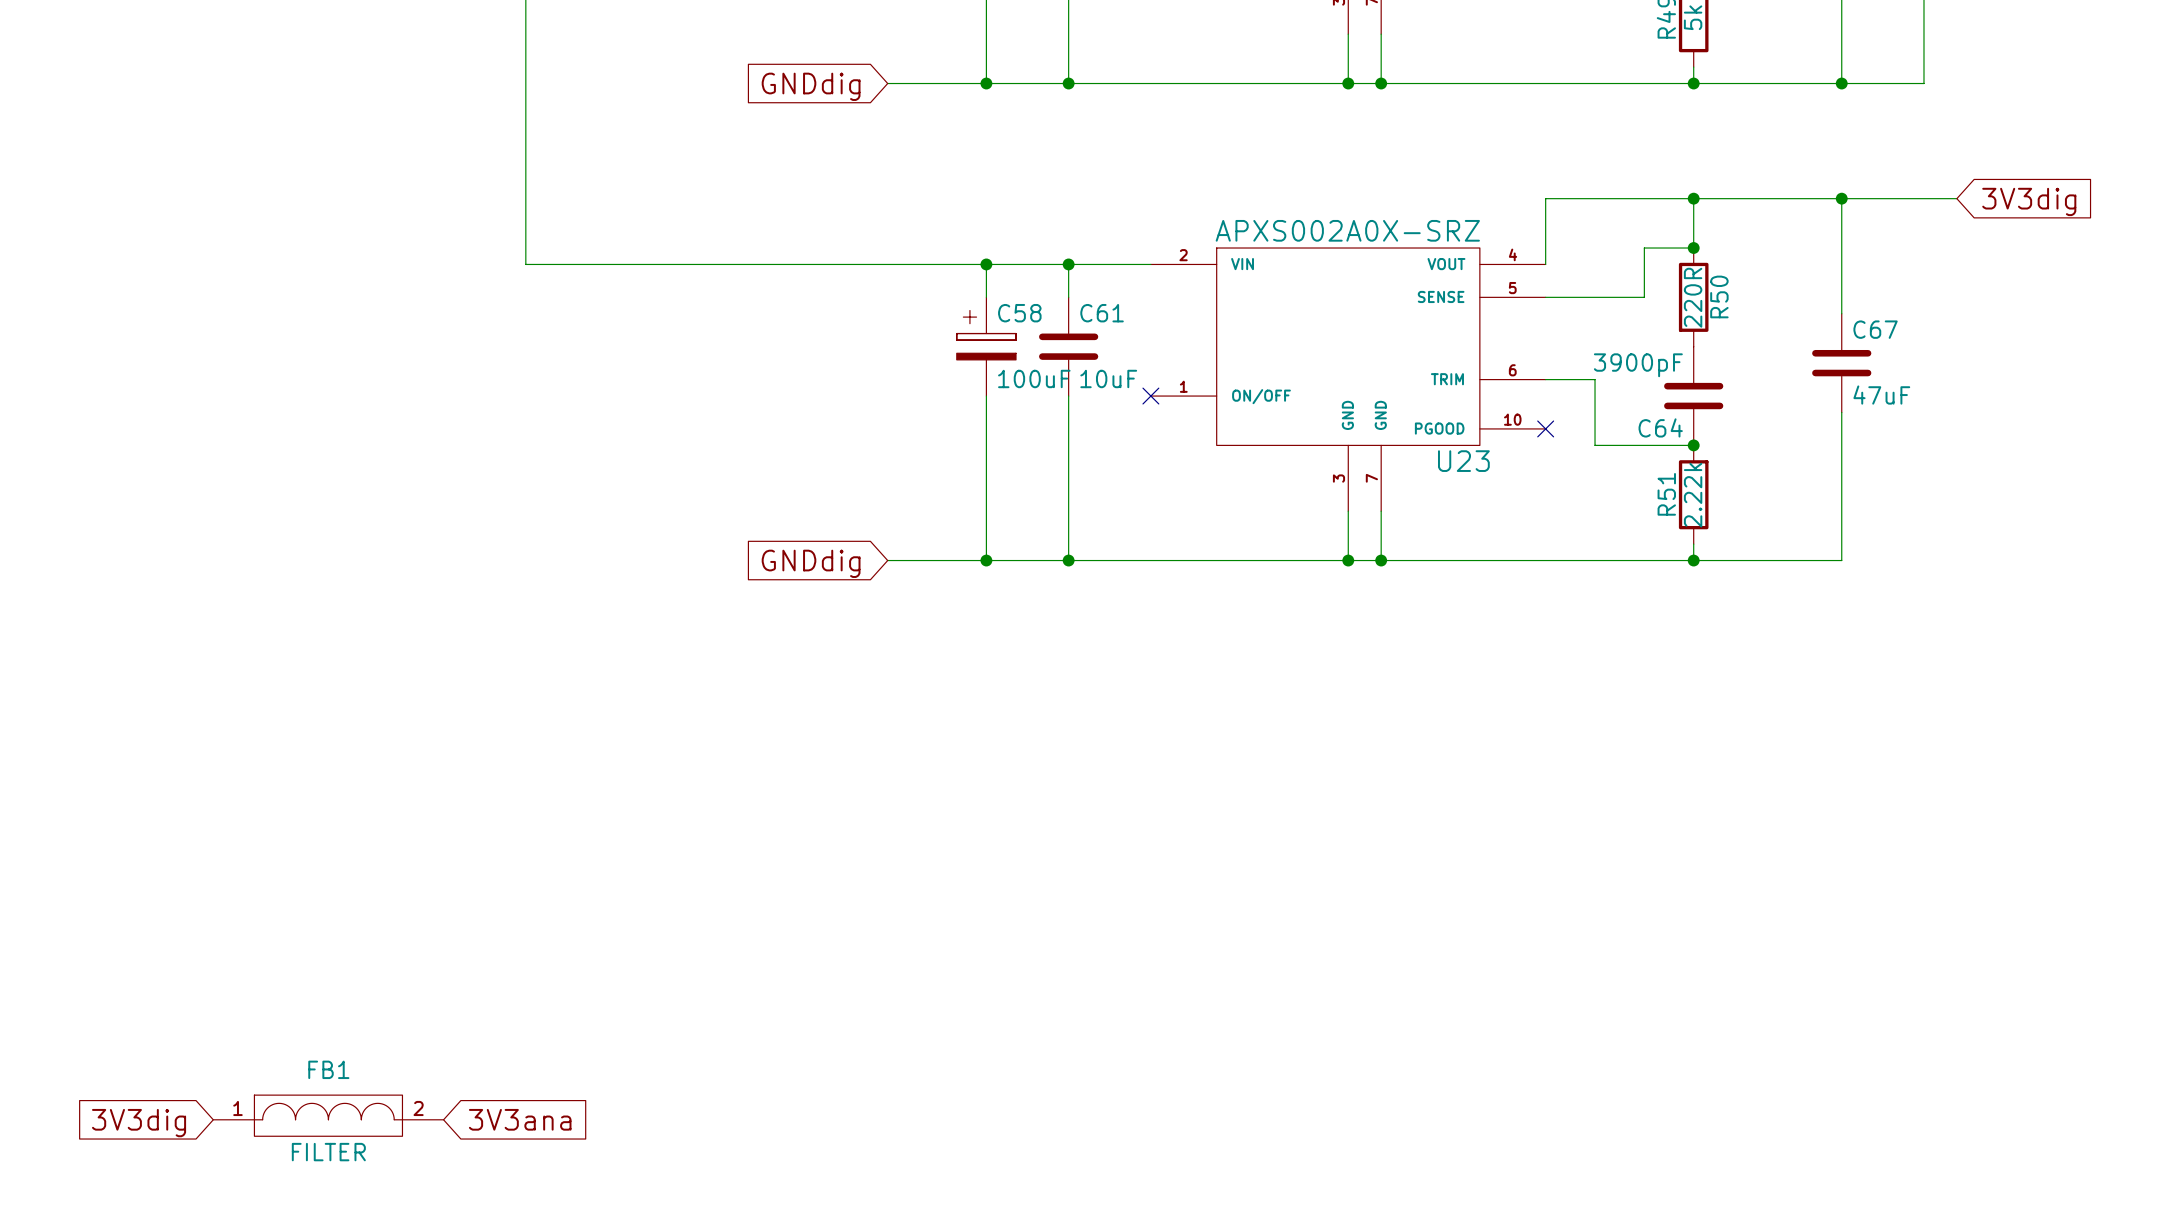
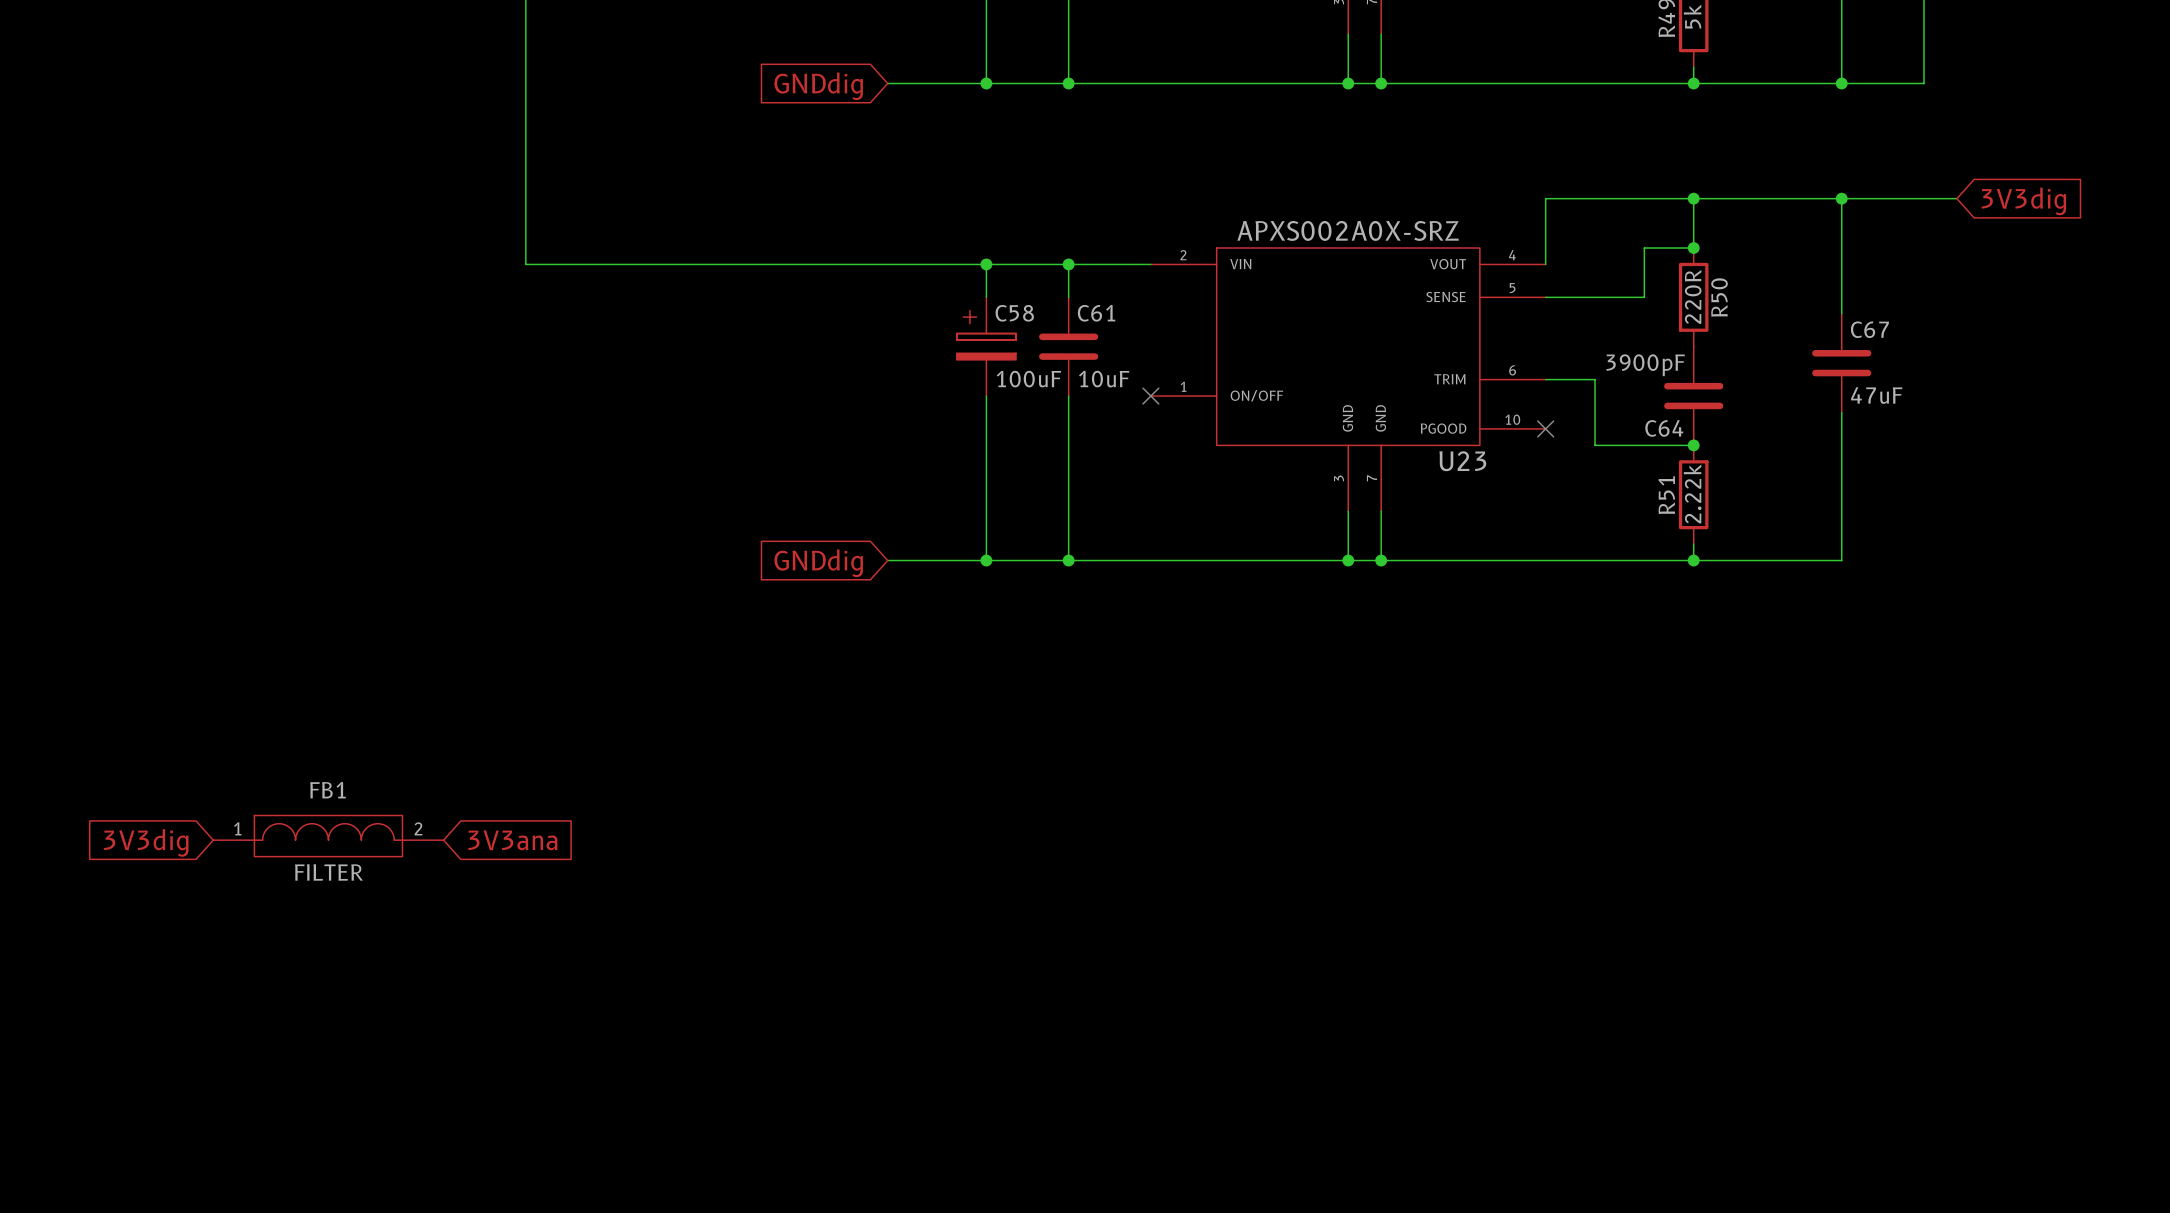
FB1 position: (328, 1115) -> (328, 836)
global label position: 3V3ana (520, 1119) -> 3V3ana (512, 840)
global label position: 3V3dig (139, 1123) -> 3V3dig (146, 842)

